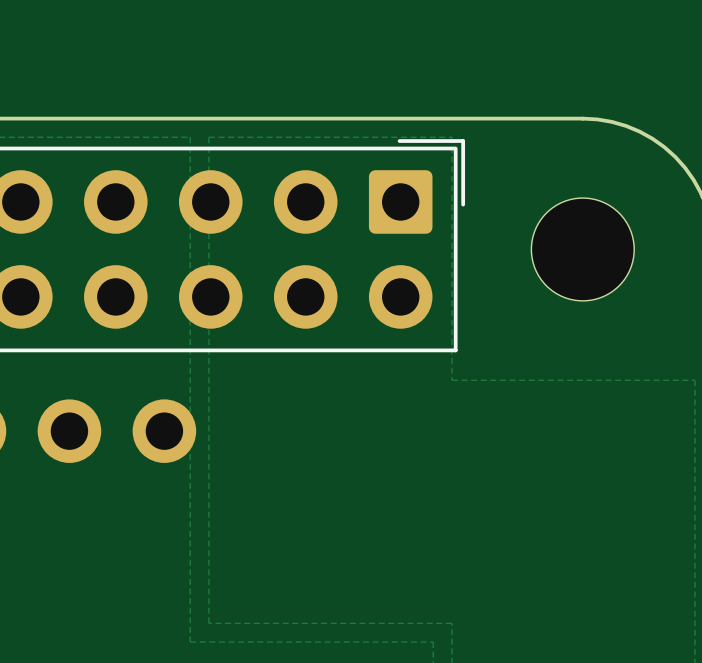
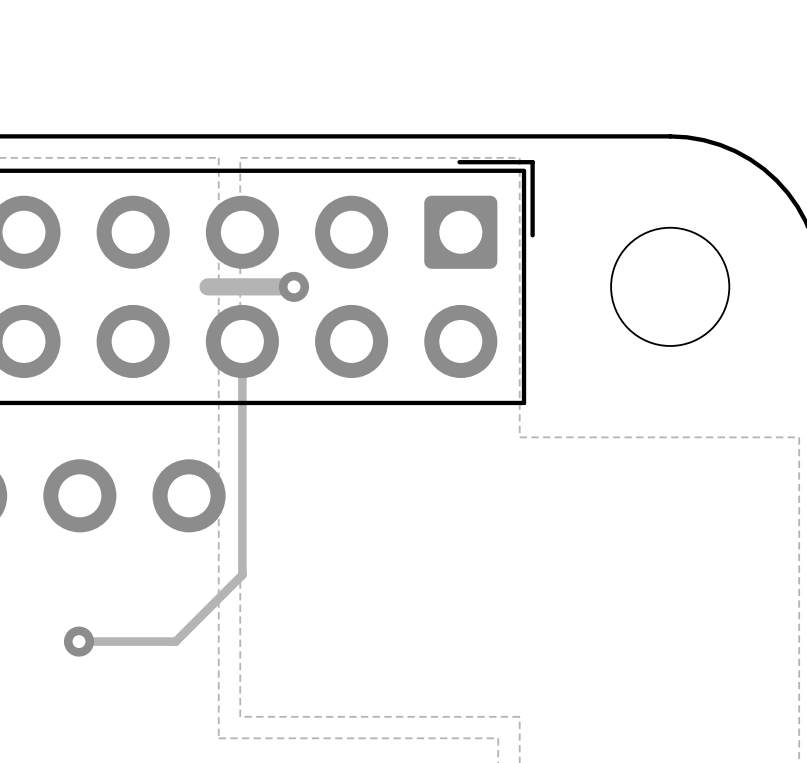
track: none -> (293, 286) (207, 286)
via: none -> (293, 286)
track: none -> (242, 341) (242, 574) (175, 641) (79, 641)
via: none -> (79, 641)

